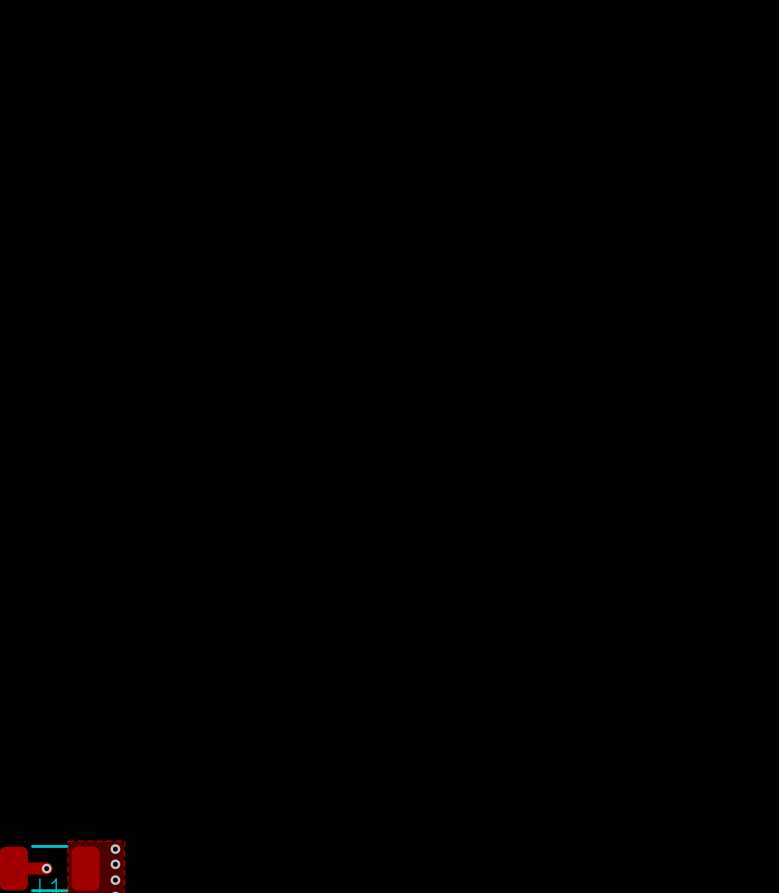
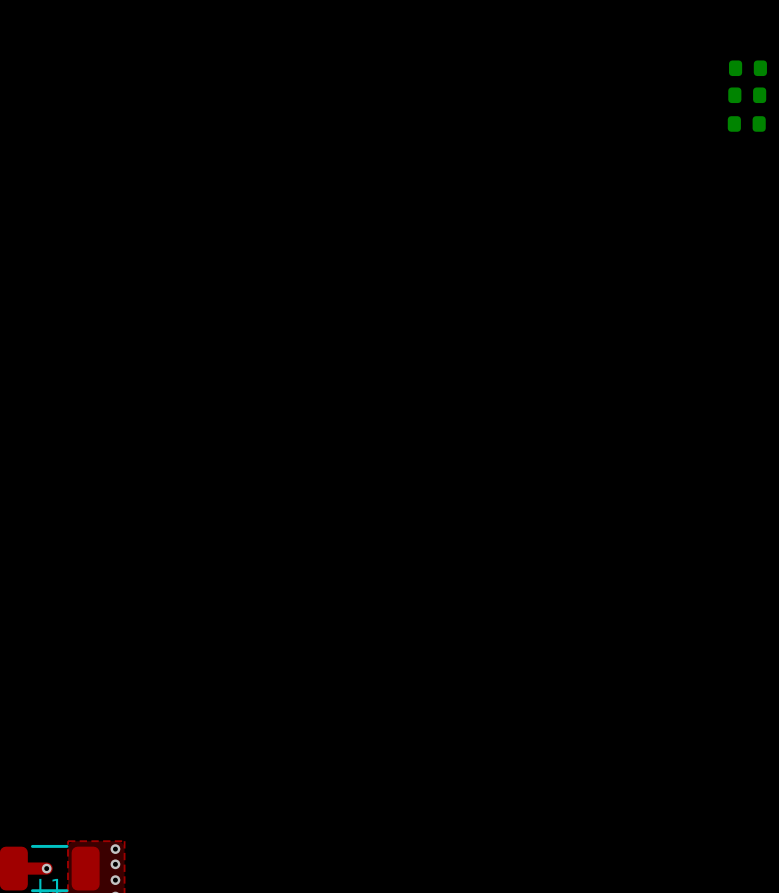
part: none -> (747, 68)
part: none -> (747, 95)
part: none -> (746, 123)

